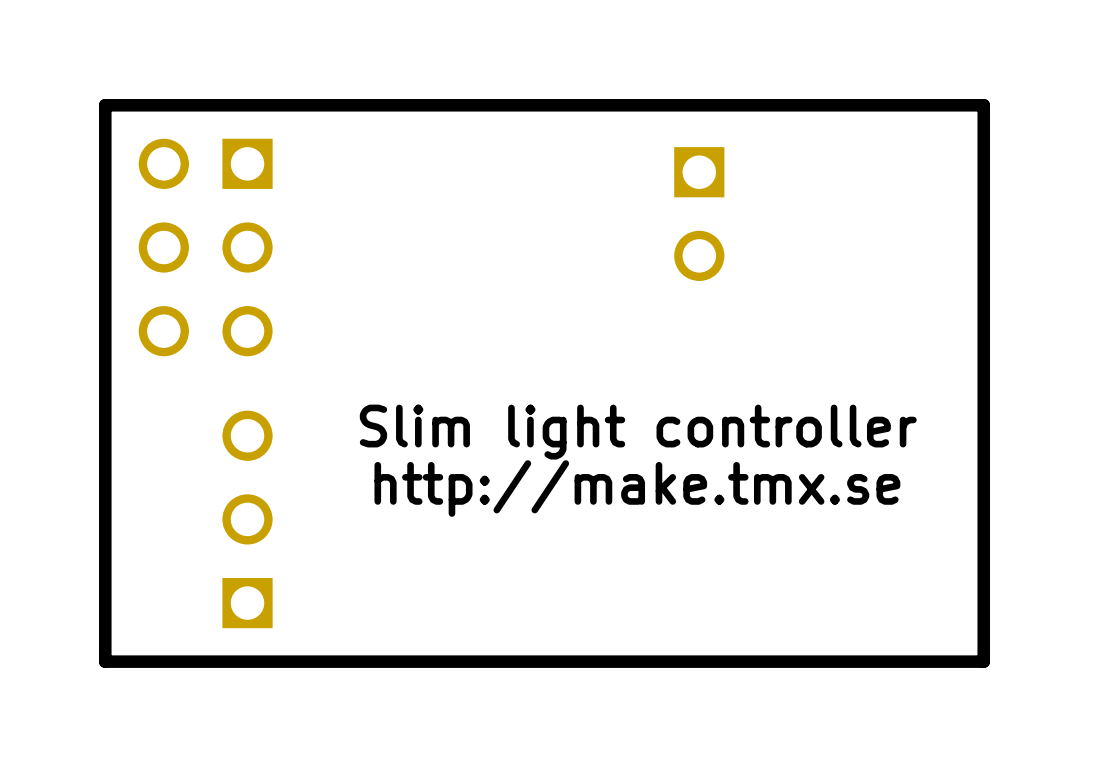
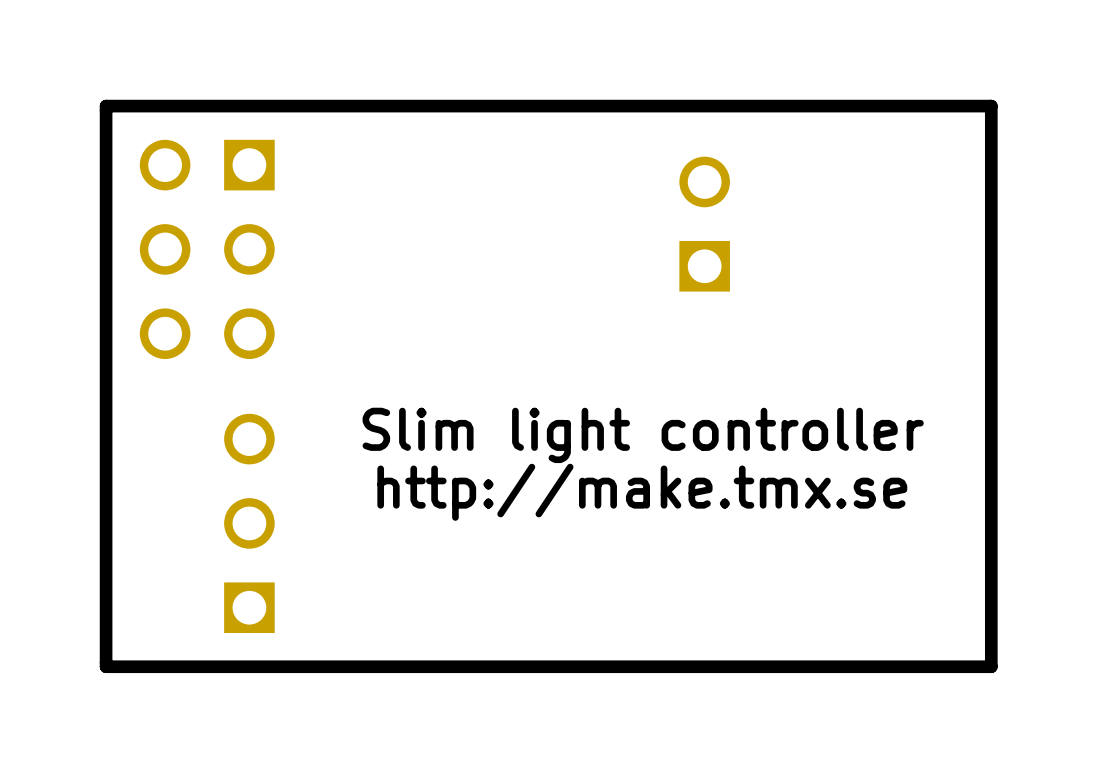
part rotation: 0° (699, 214) -> 180° (704, 224)

